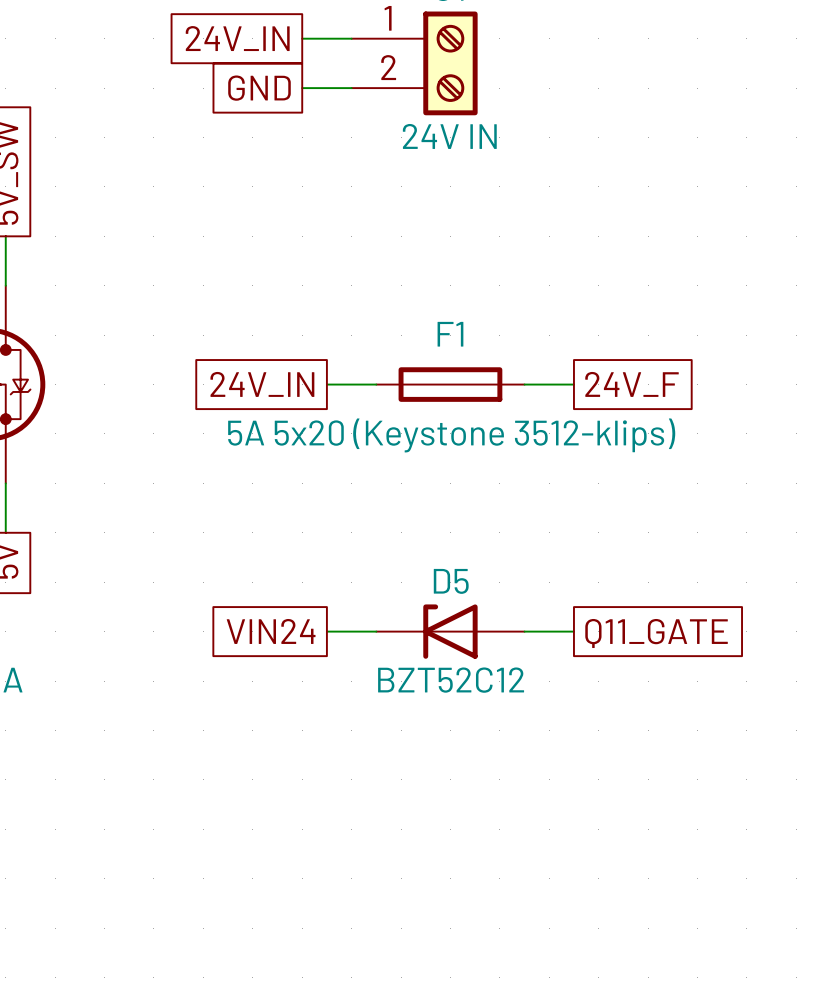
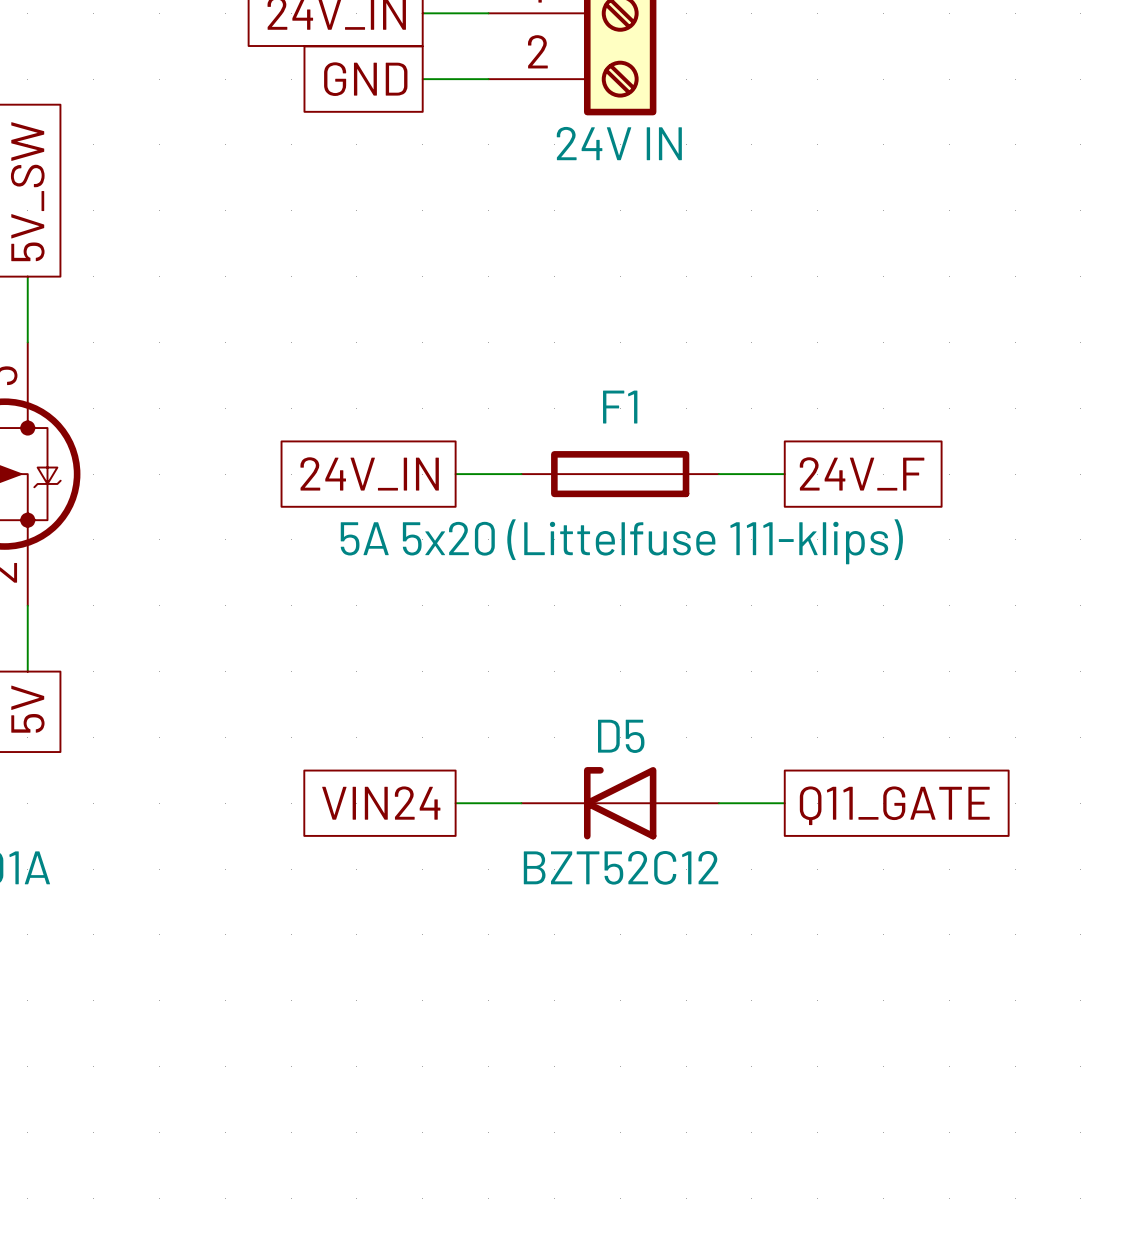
F1 value: 5A 5x20 (Keystone 3512-klips) (451, 435) -> 5A 5x20 (Littelfuse 111-klips) (621, 541)

